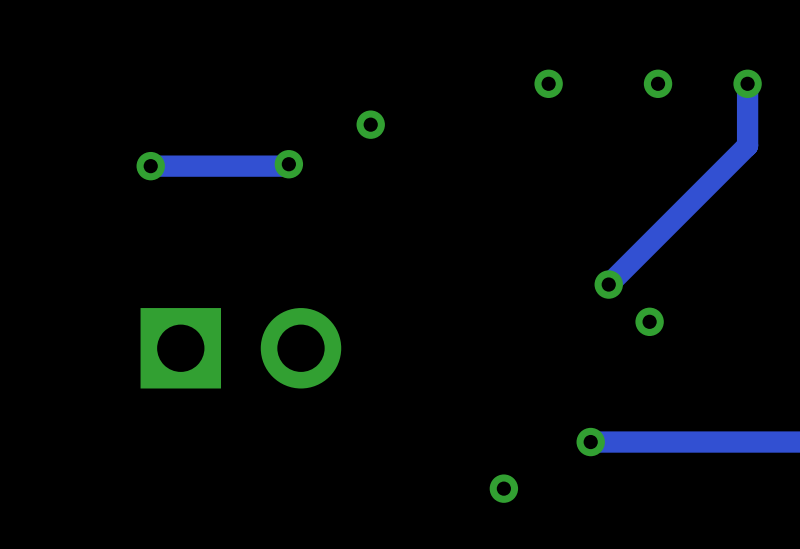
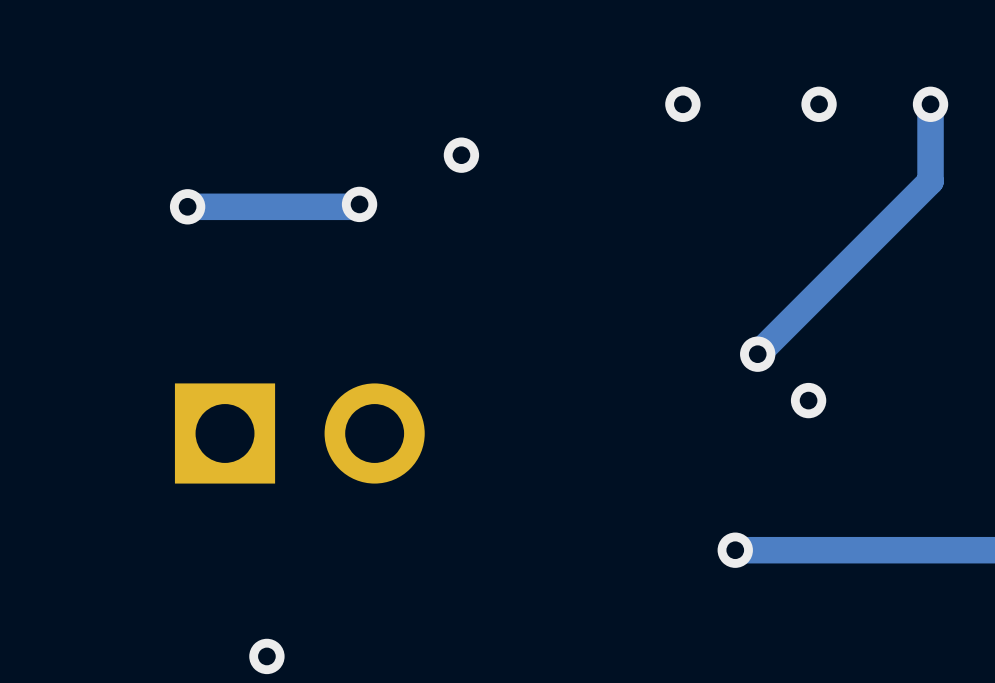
via: (503, 488) -> none
via: none -> (266, 656)

